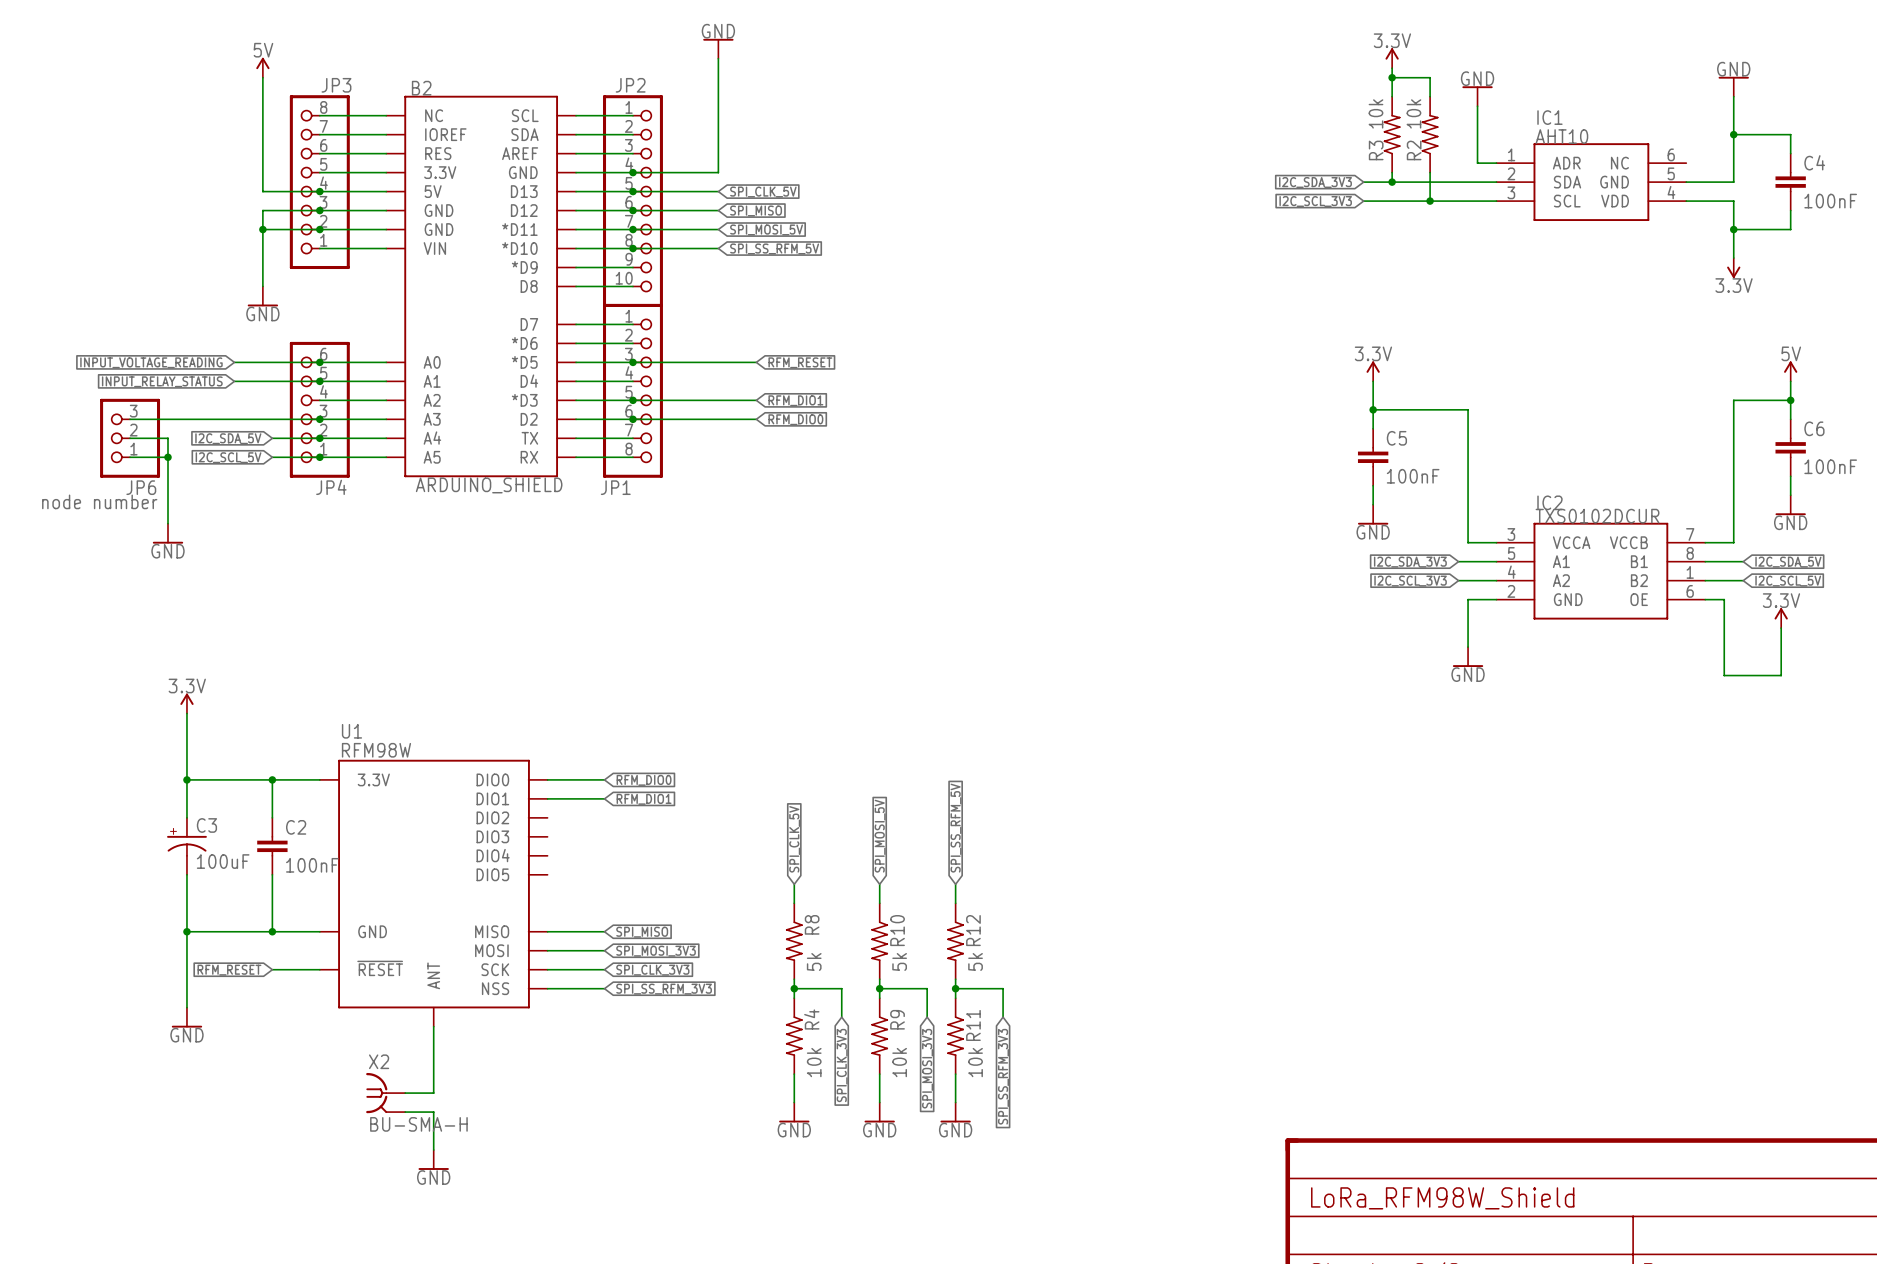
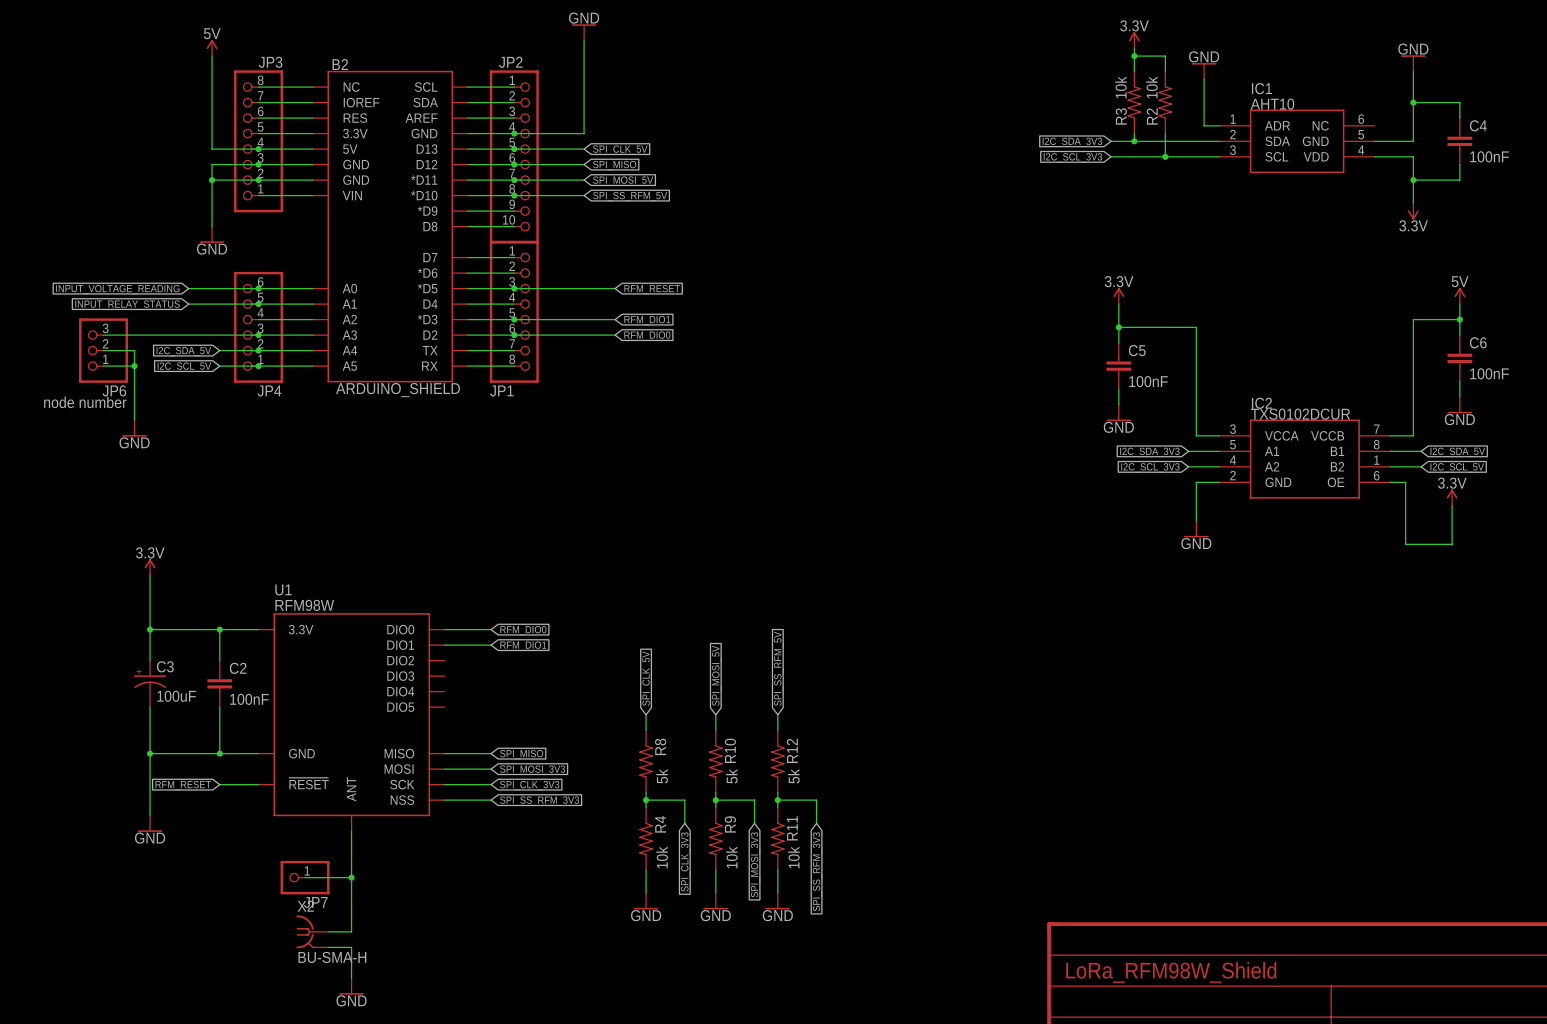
wire: none -> (305, 877) (351, 877)
JP7: none -> (305, 877)
junction: none -> (351, 877)
X2 position: (385, 1093) -> (312, 931)
wire: (405, 1093) (433, 1093) -> (351, 900) (351, 885)
wire: (405, 1112) (433, 1112) -> (328, 931) (351, 931)
power symbol position: GND (433, 1159) -> GND (351, 986)
wire: none -> (328, 947) (351, 947) (351, 978)

